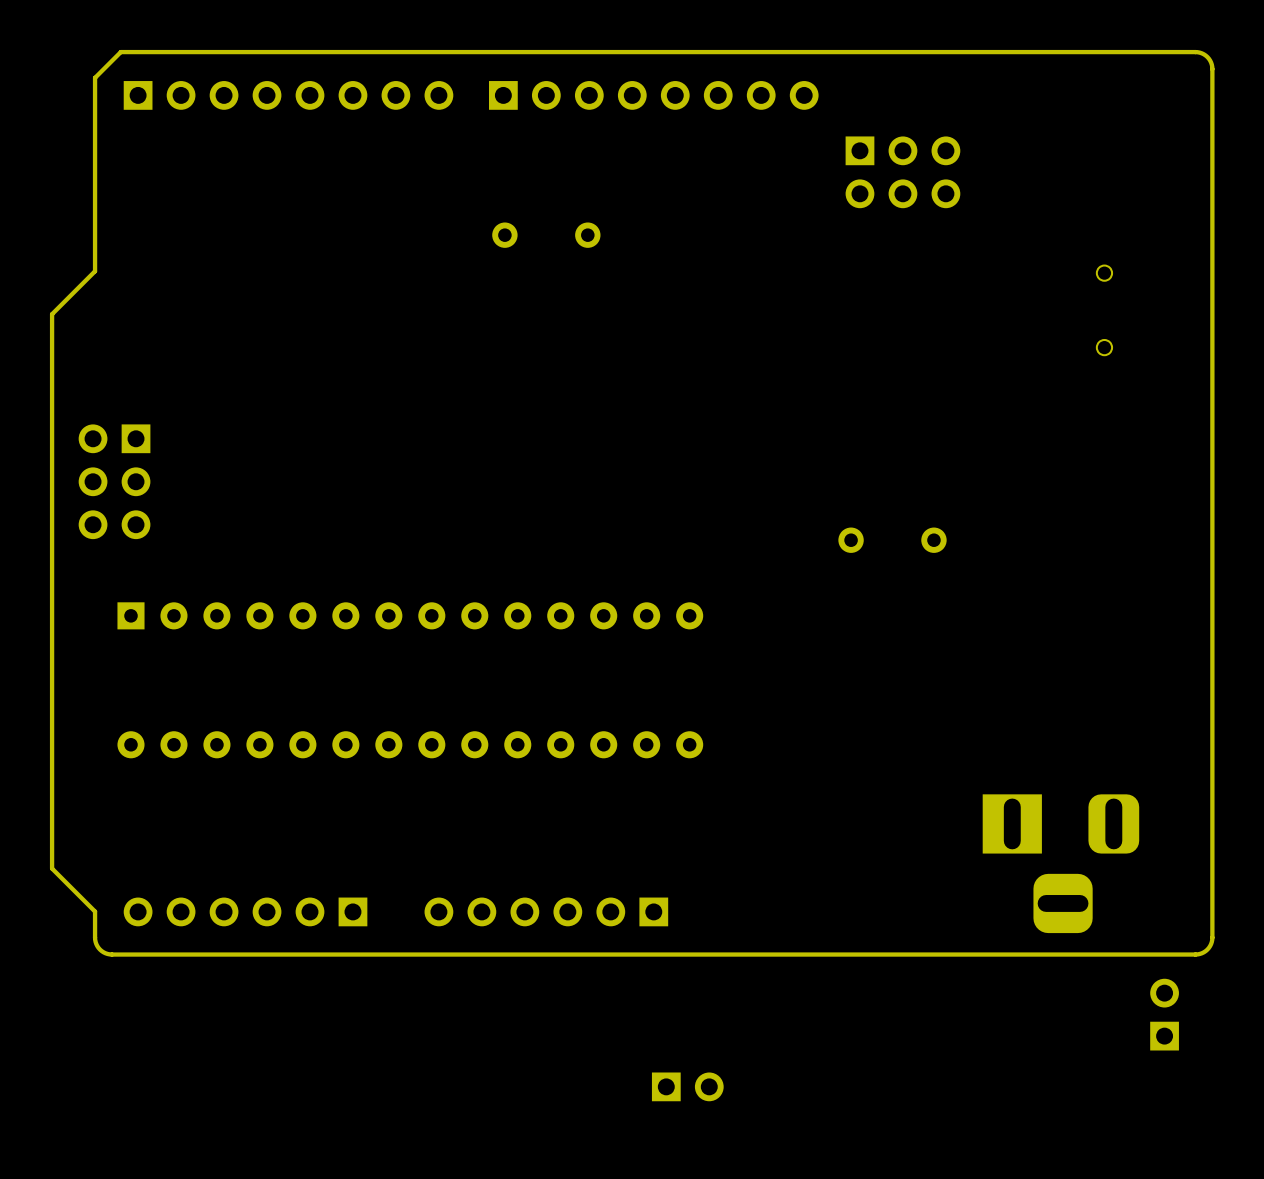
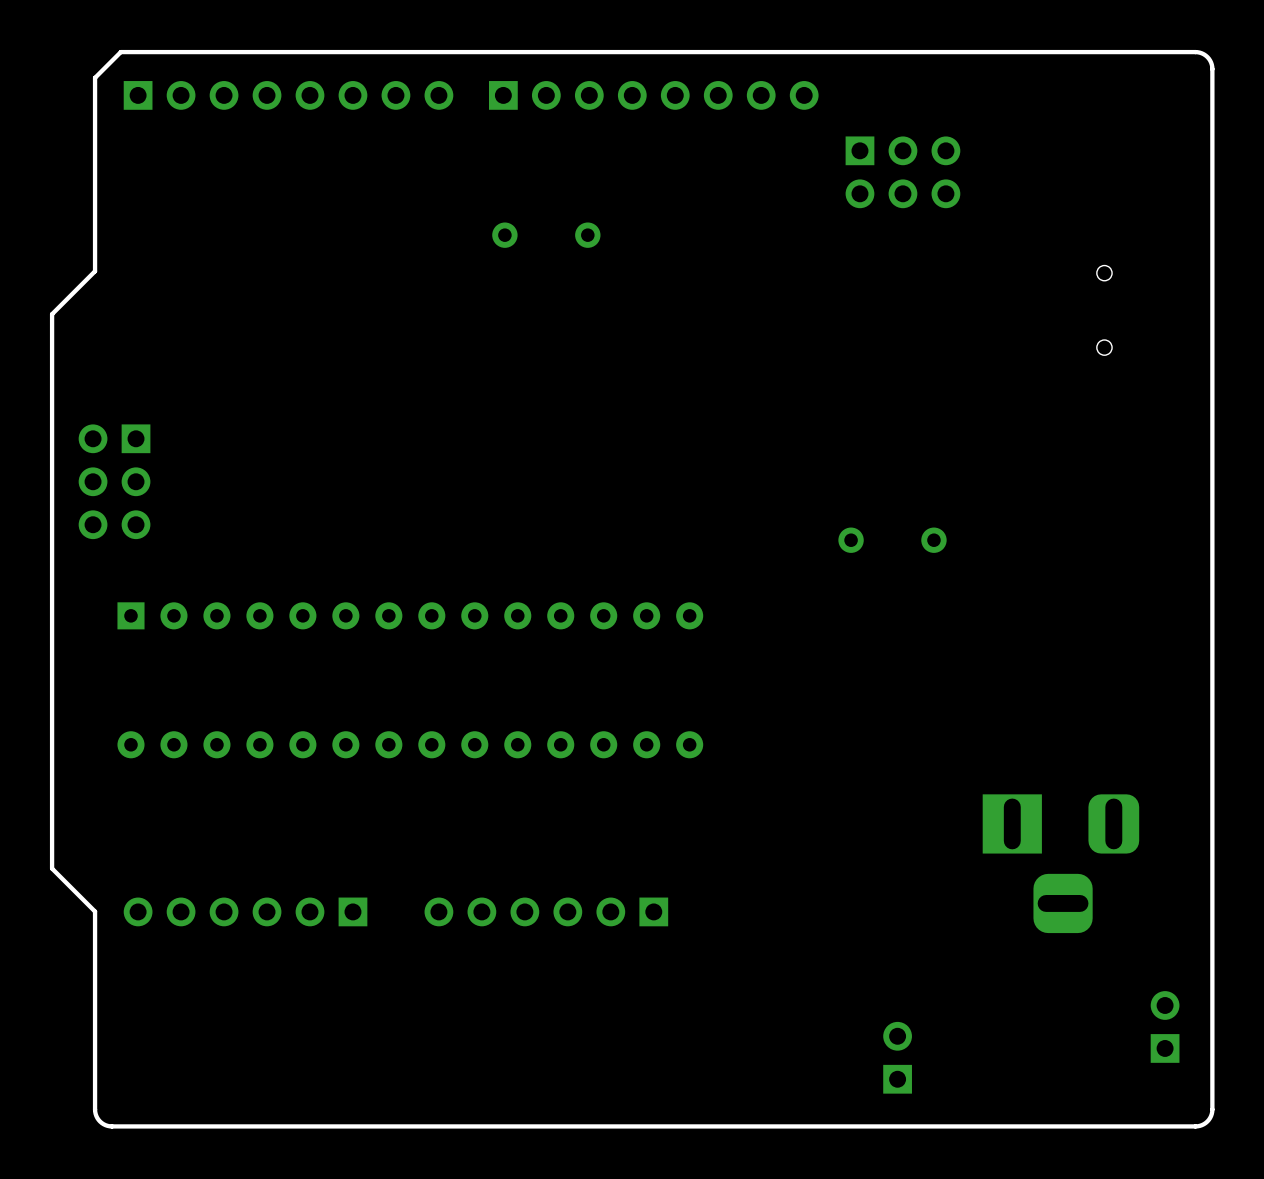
board edge: (1212, 937) (1207, 949) (1195, 954) (111, 954) (100, 949) (95, 937) -> (1212, 937) (1212, 1111) (1207, 1121) (1195, 1126) (109, 1126) (100, 1121) (95, 1111) (95, 937)
part position: (1164, 1014) -> (1165, 1026)
part rotation: 0° (687, 1086) -> 90° counterclockwise (897, 1057)
part position: (687, 1086) -> (897, 1057)

